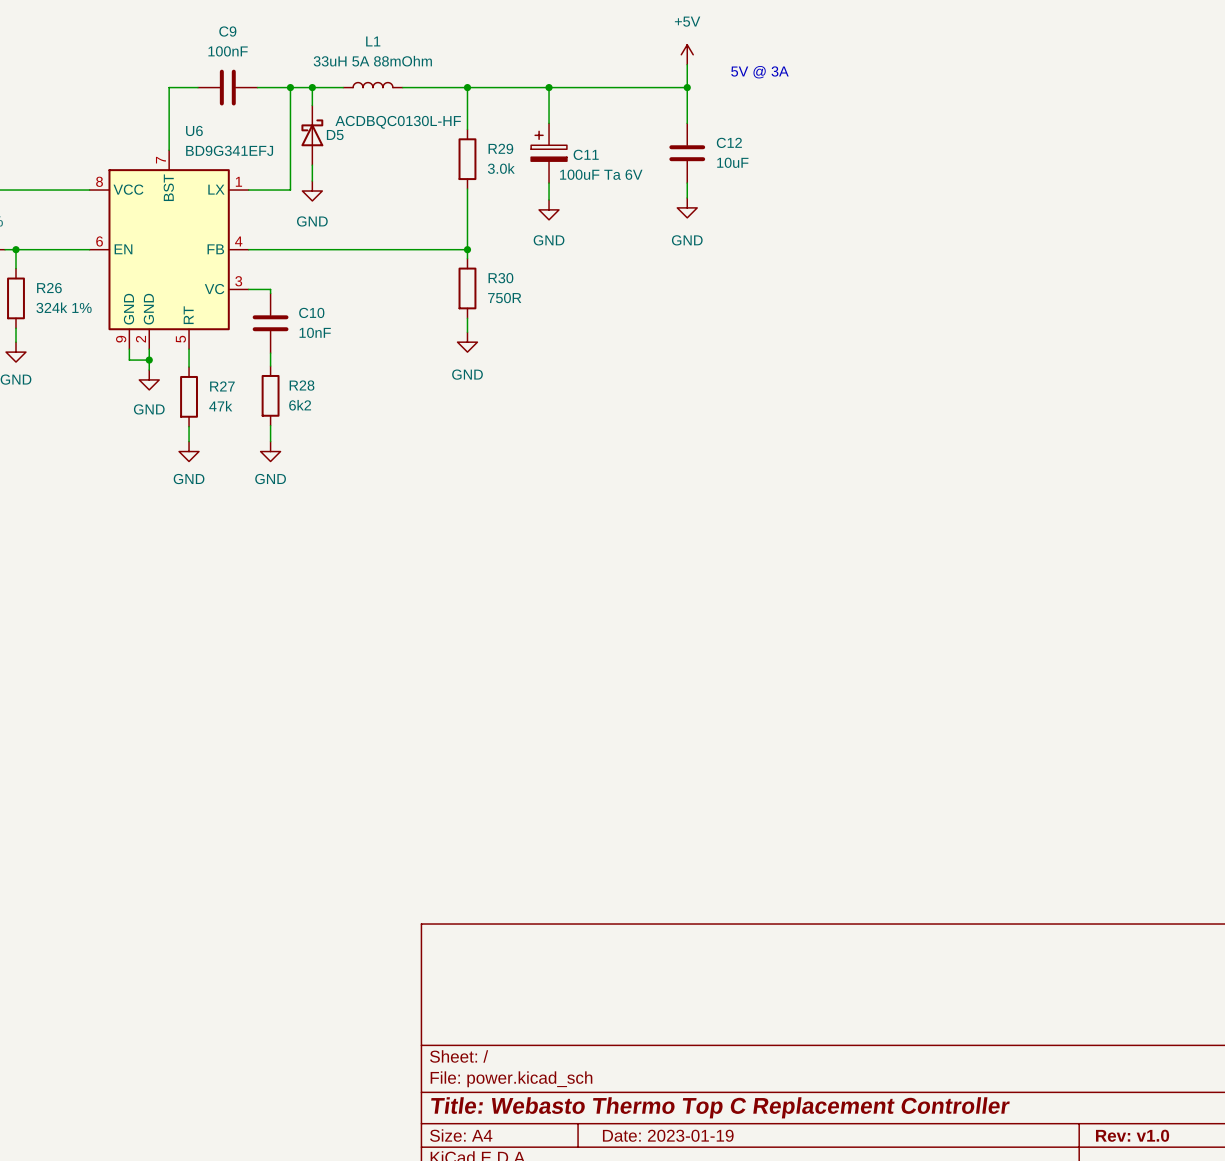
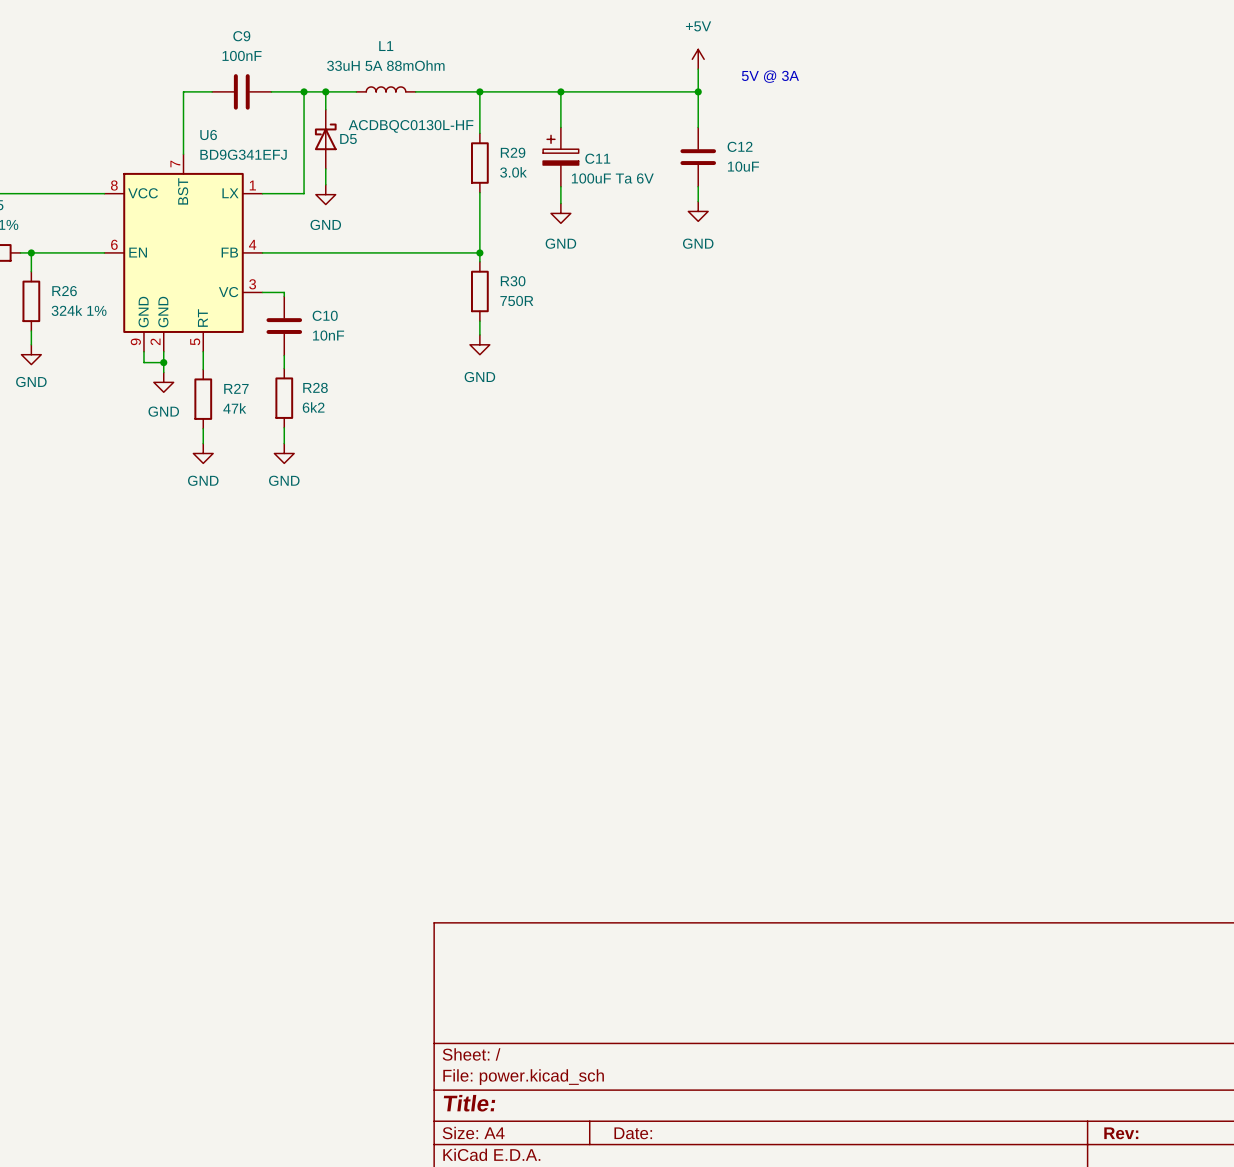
title block: Title: Webasto Thermo Top C Replacement Controller (720, 1107) -> Title: (469, 1103)
title block: Date: 2023-01-19 (668, 1135) -> Date: (633, 1133)
title block: Rev: v1.0 (1132, 1135) -> Rev: (1121, 1133)

